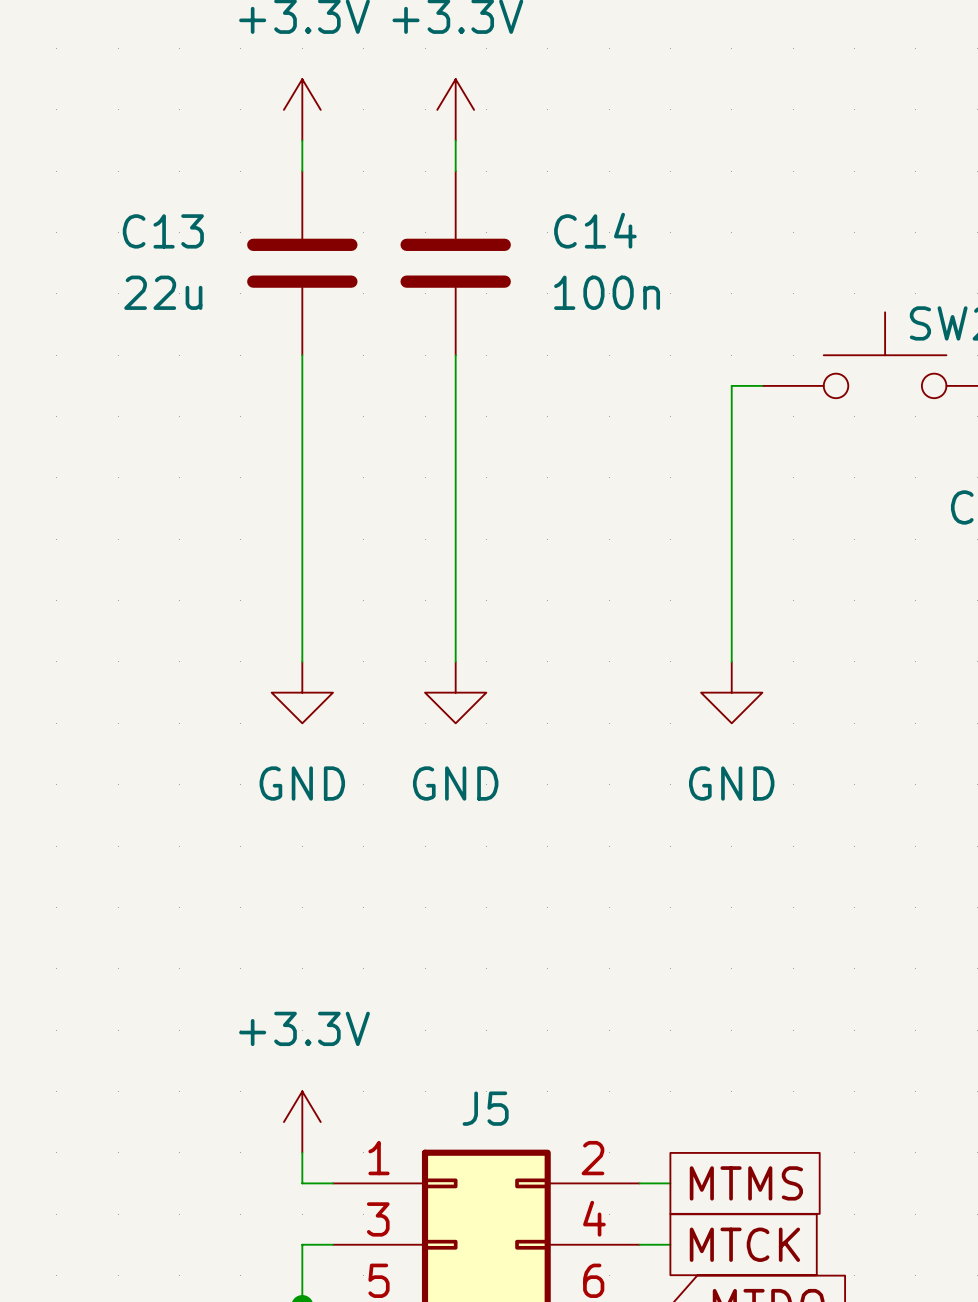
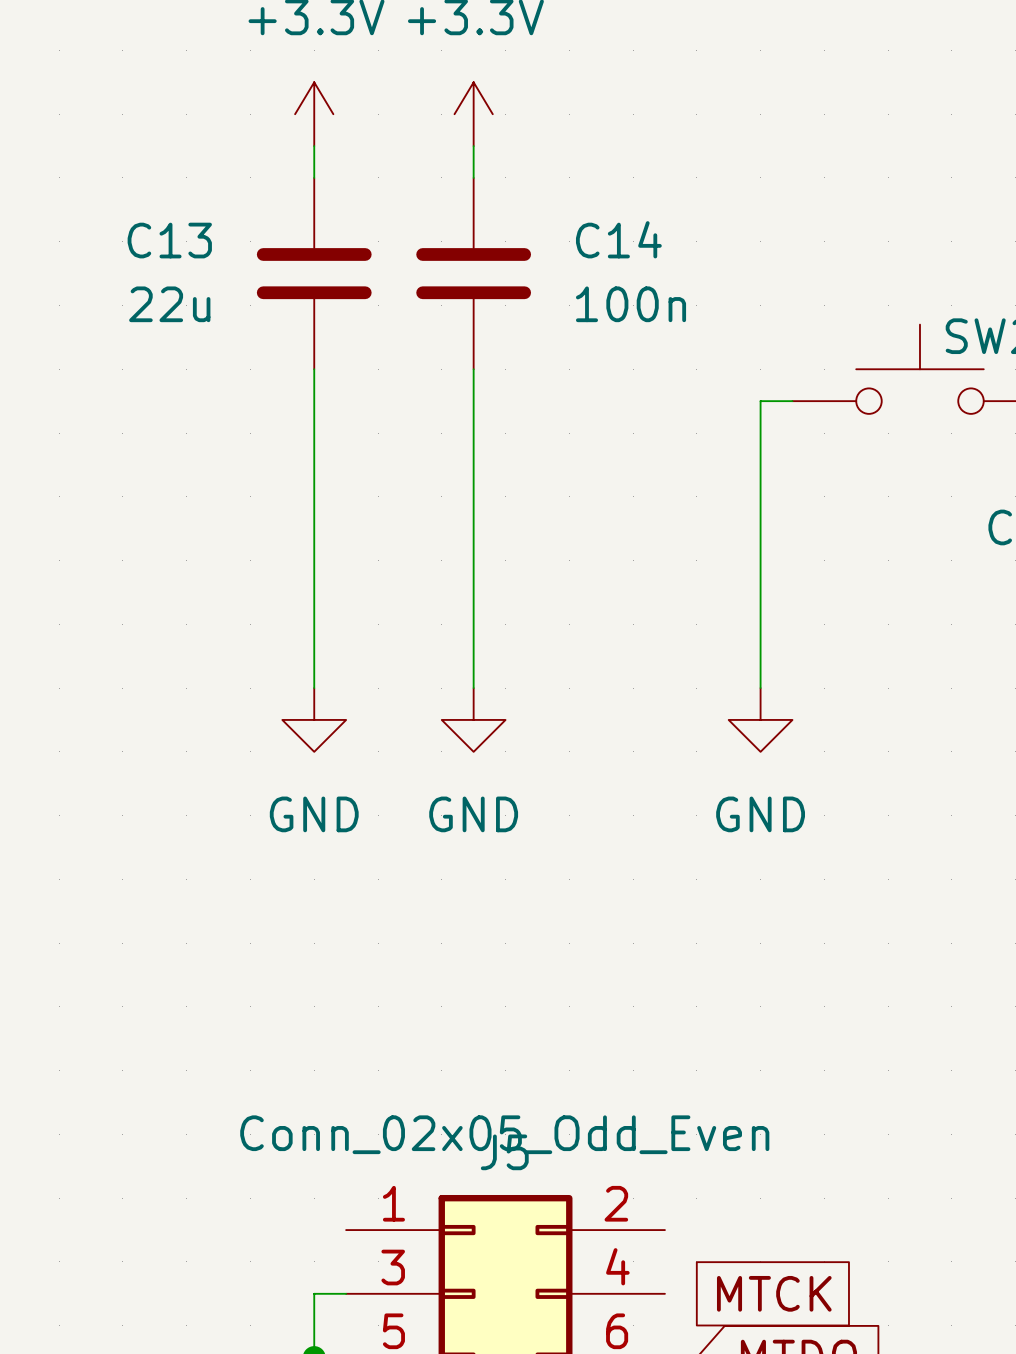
J5 value: none -> Conn_02x05_Odd_Even (504, 1134)
power symbol: +3.3V (302, 1122) -> none
wire: (302, 1152) (302, 1183) (332, 1183) -> none
wire: (639, 1183) (670, 1183) -> none
global label: MTMS (746, 1183) -> none
wire: (639, 1244) (670, 1244) -> none

